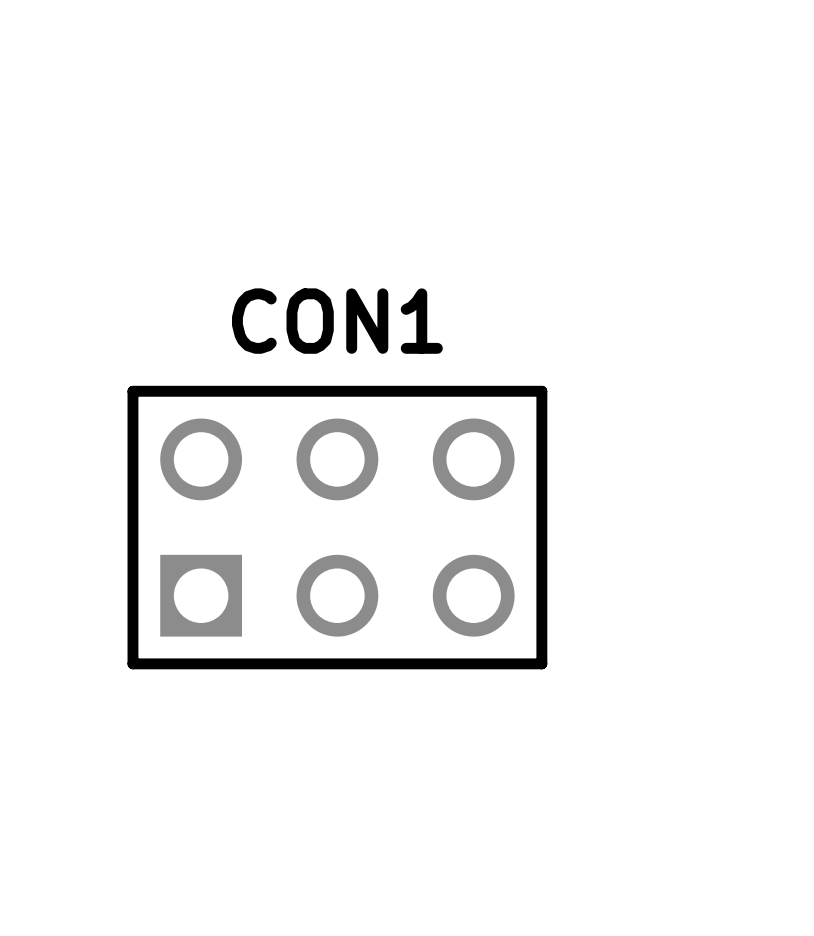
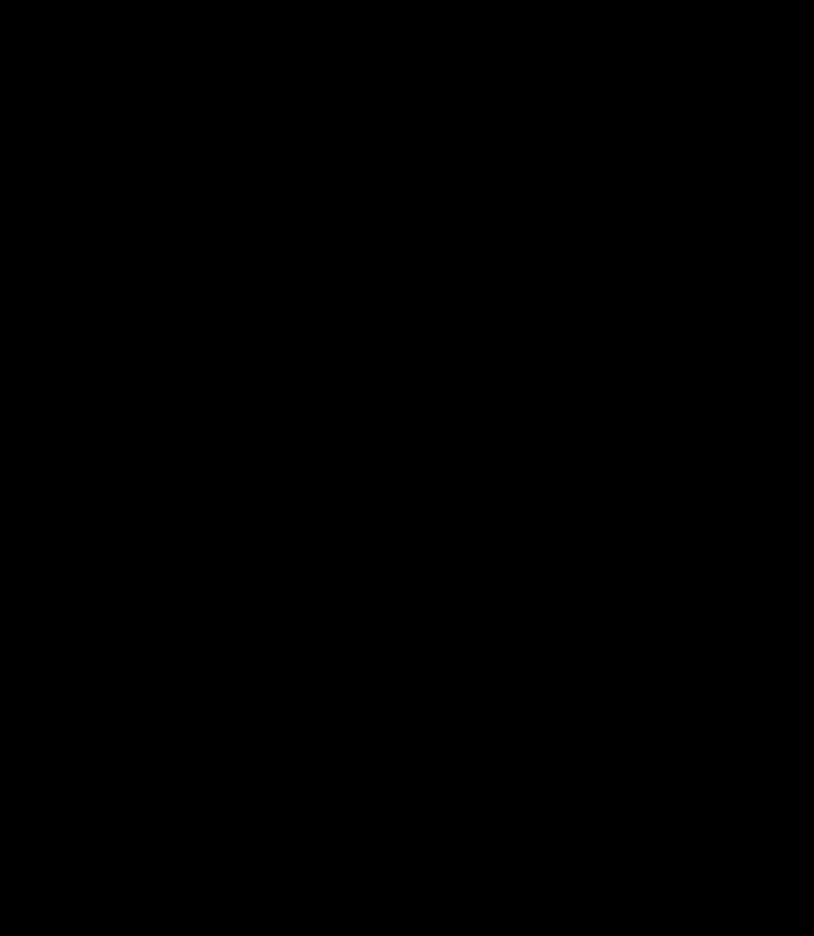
CON1: (337, 527) -> none

